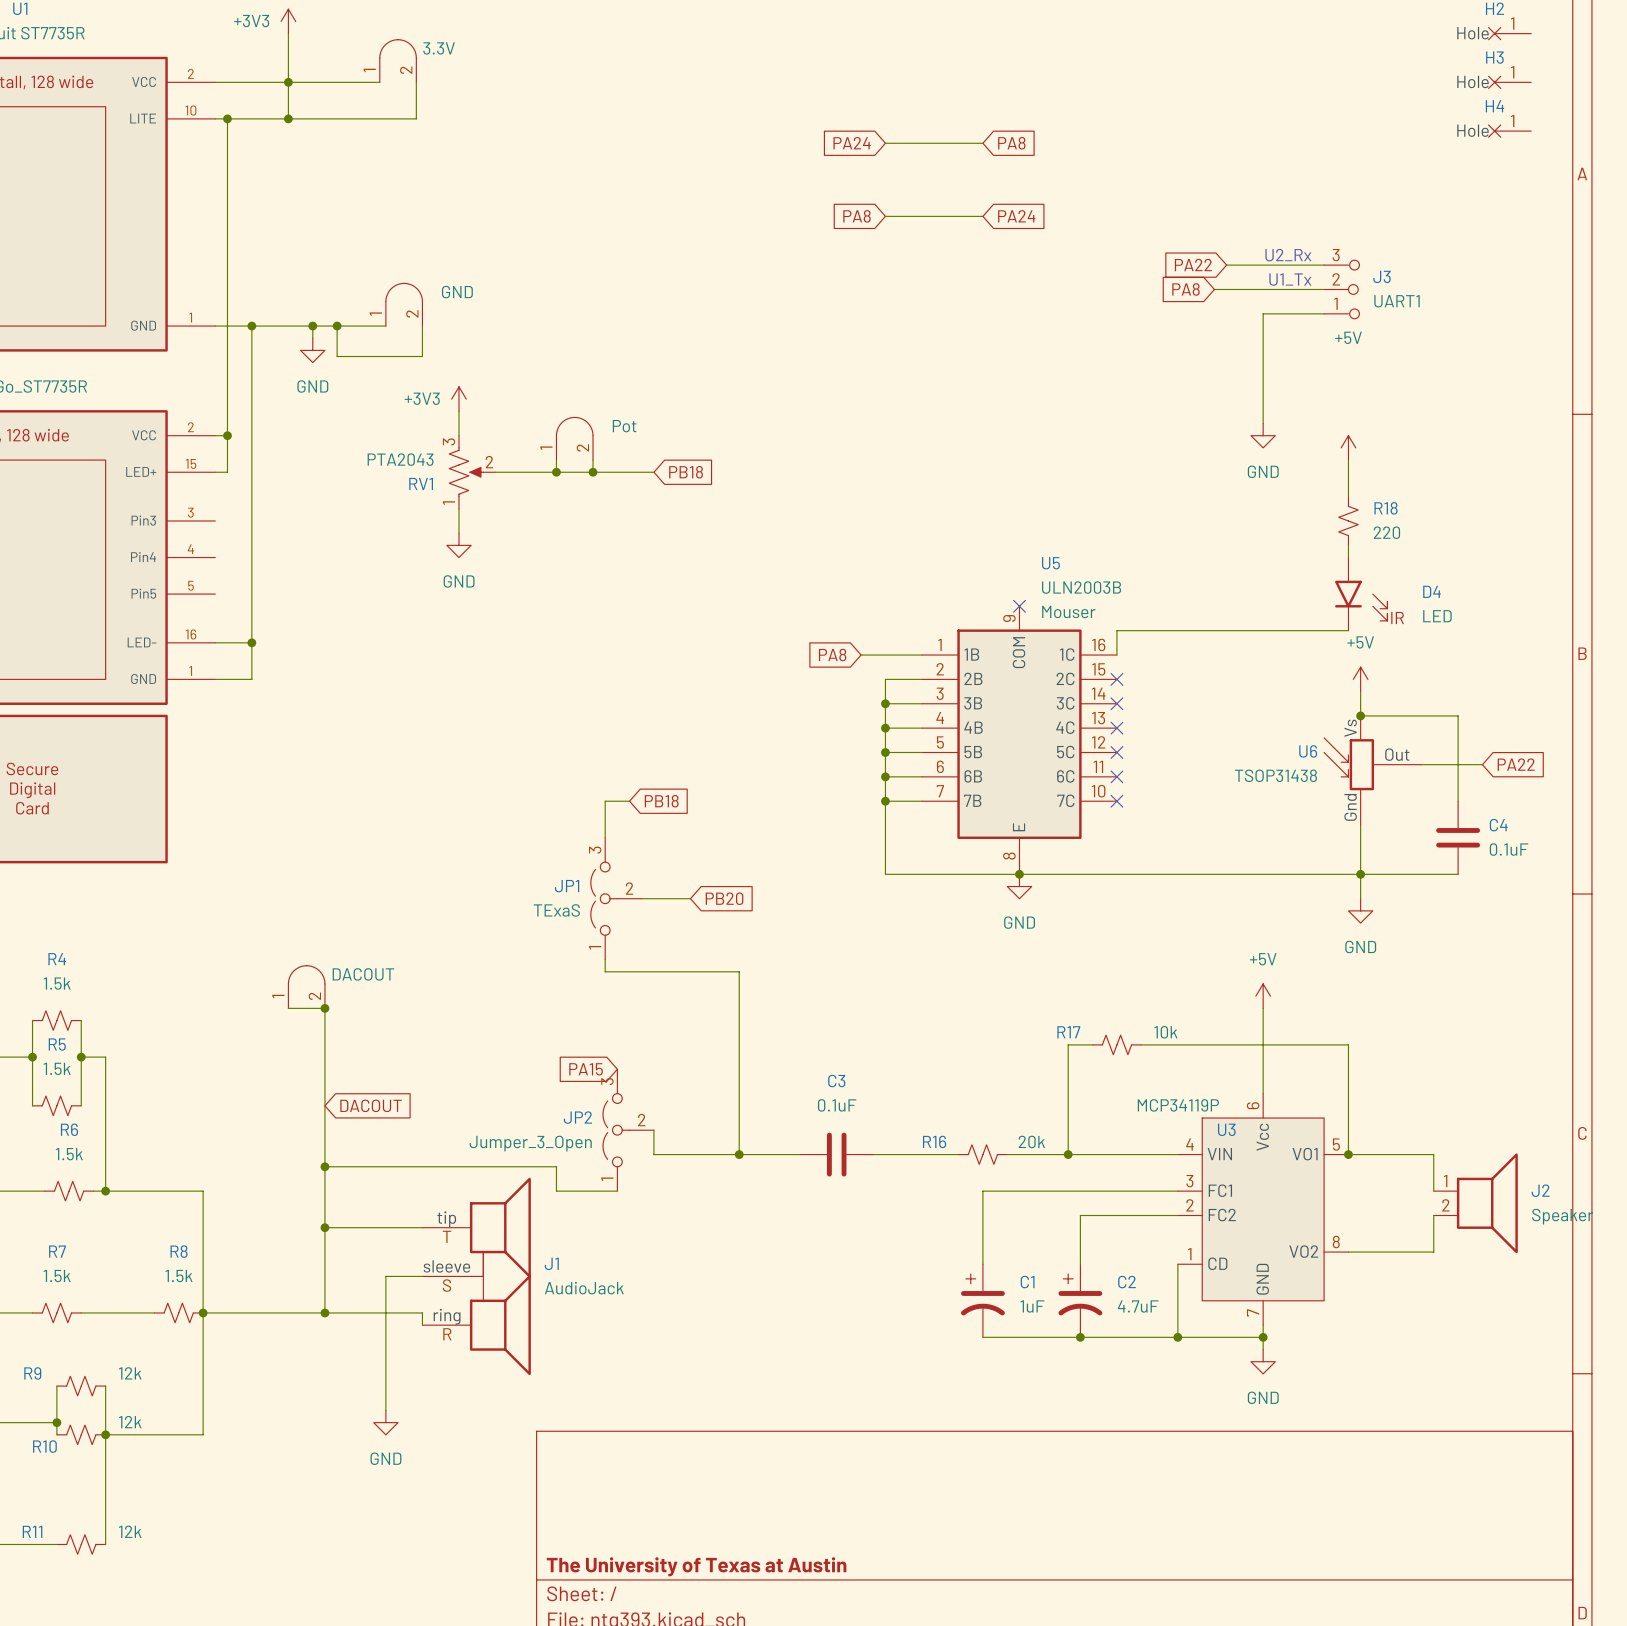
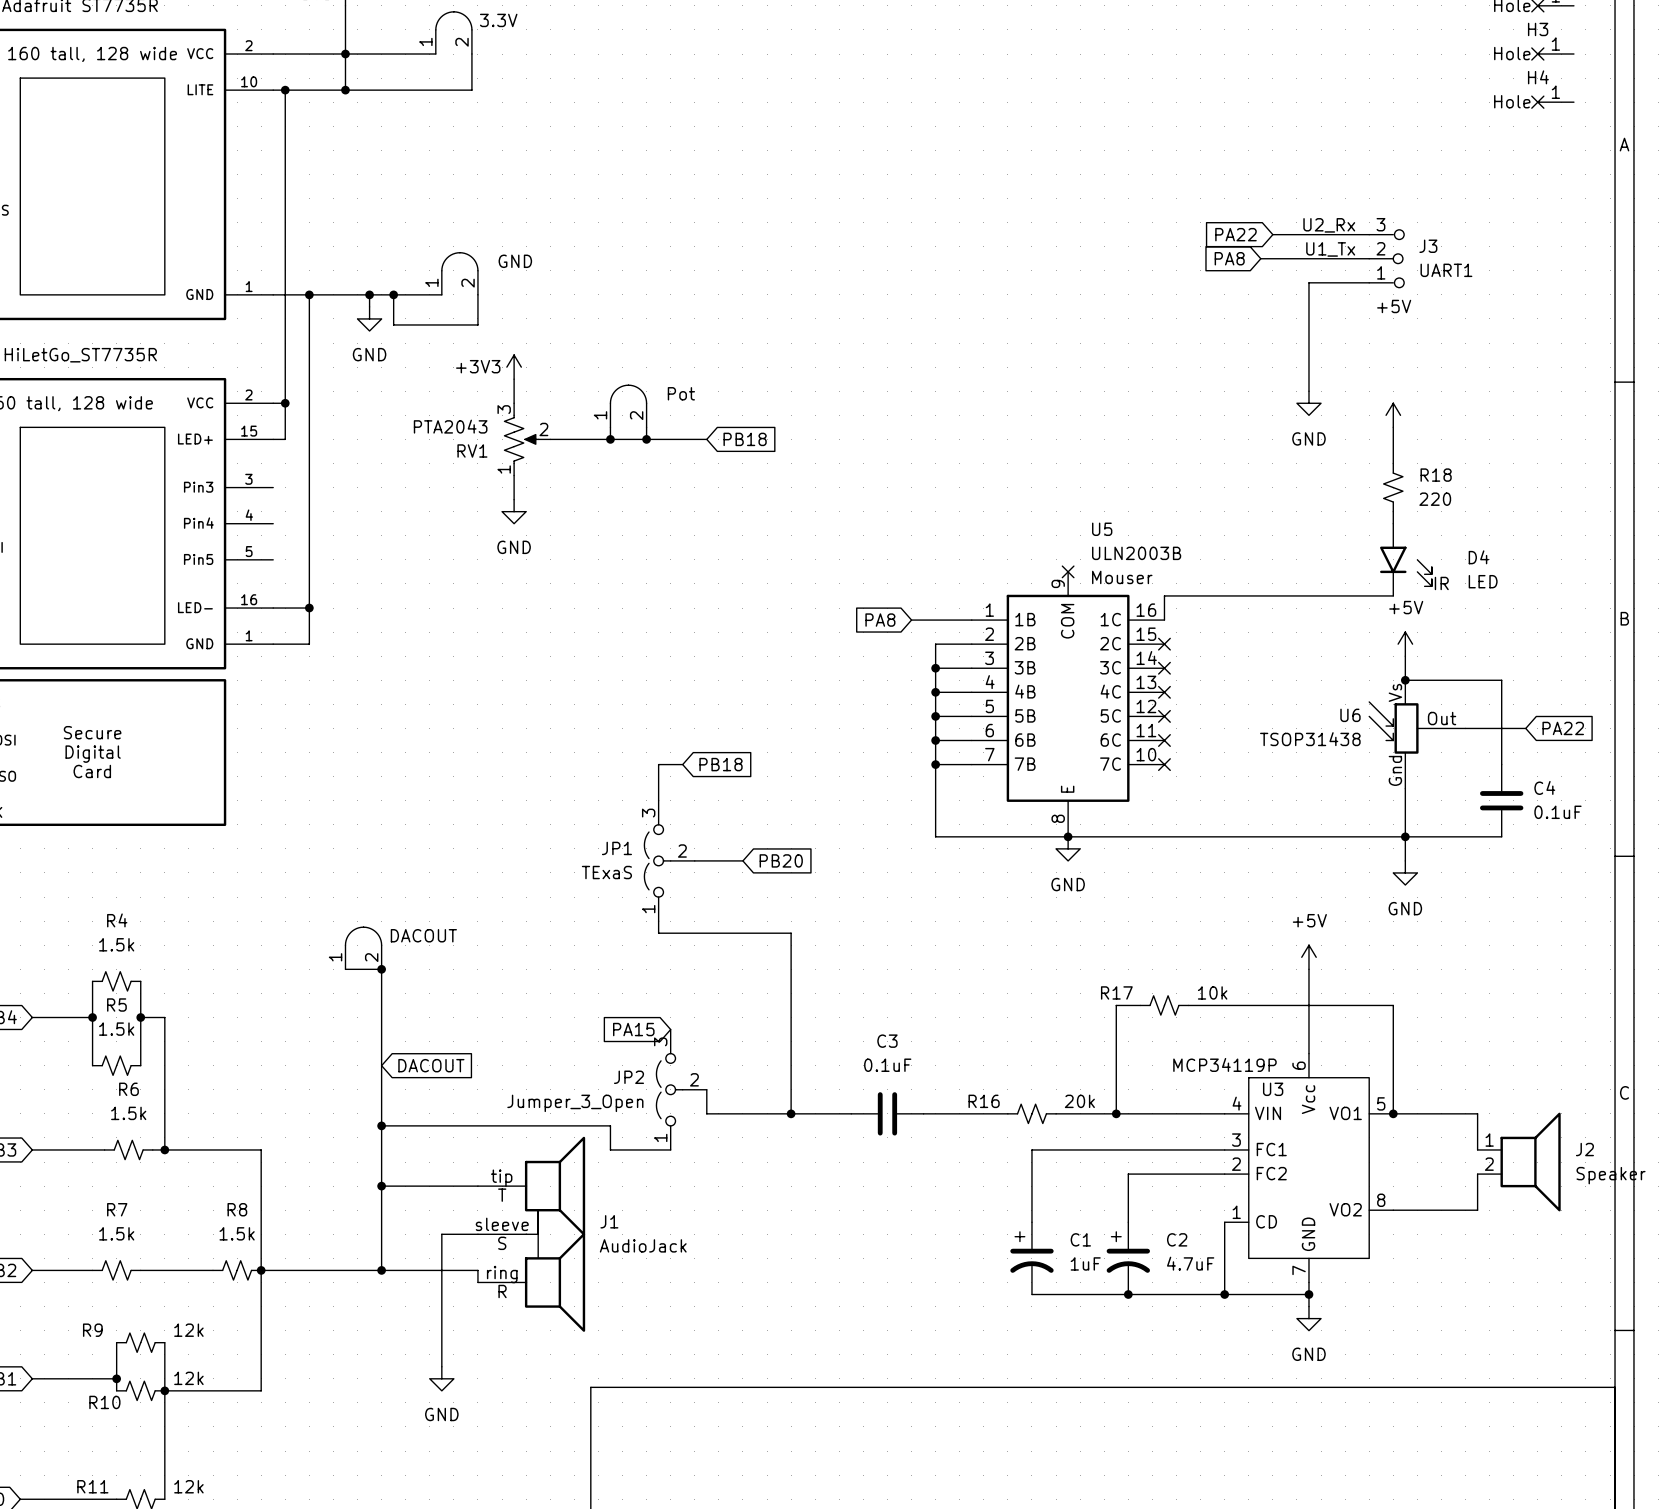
global label: PA24 (852, 143) -> none
wire: (885, 143) (982, 143) -> none
global label: PA8 (1011, 143) -> none
global label: PA8 (856, 216) -> none
wire: (885, 216) (982, 216) -> none
global label: PA24 (1016, 216) -> none

